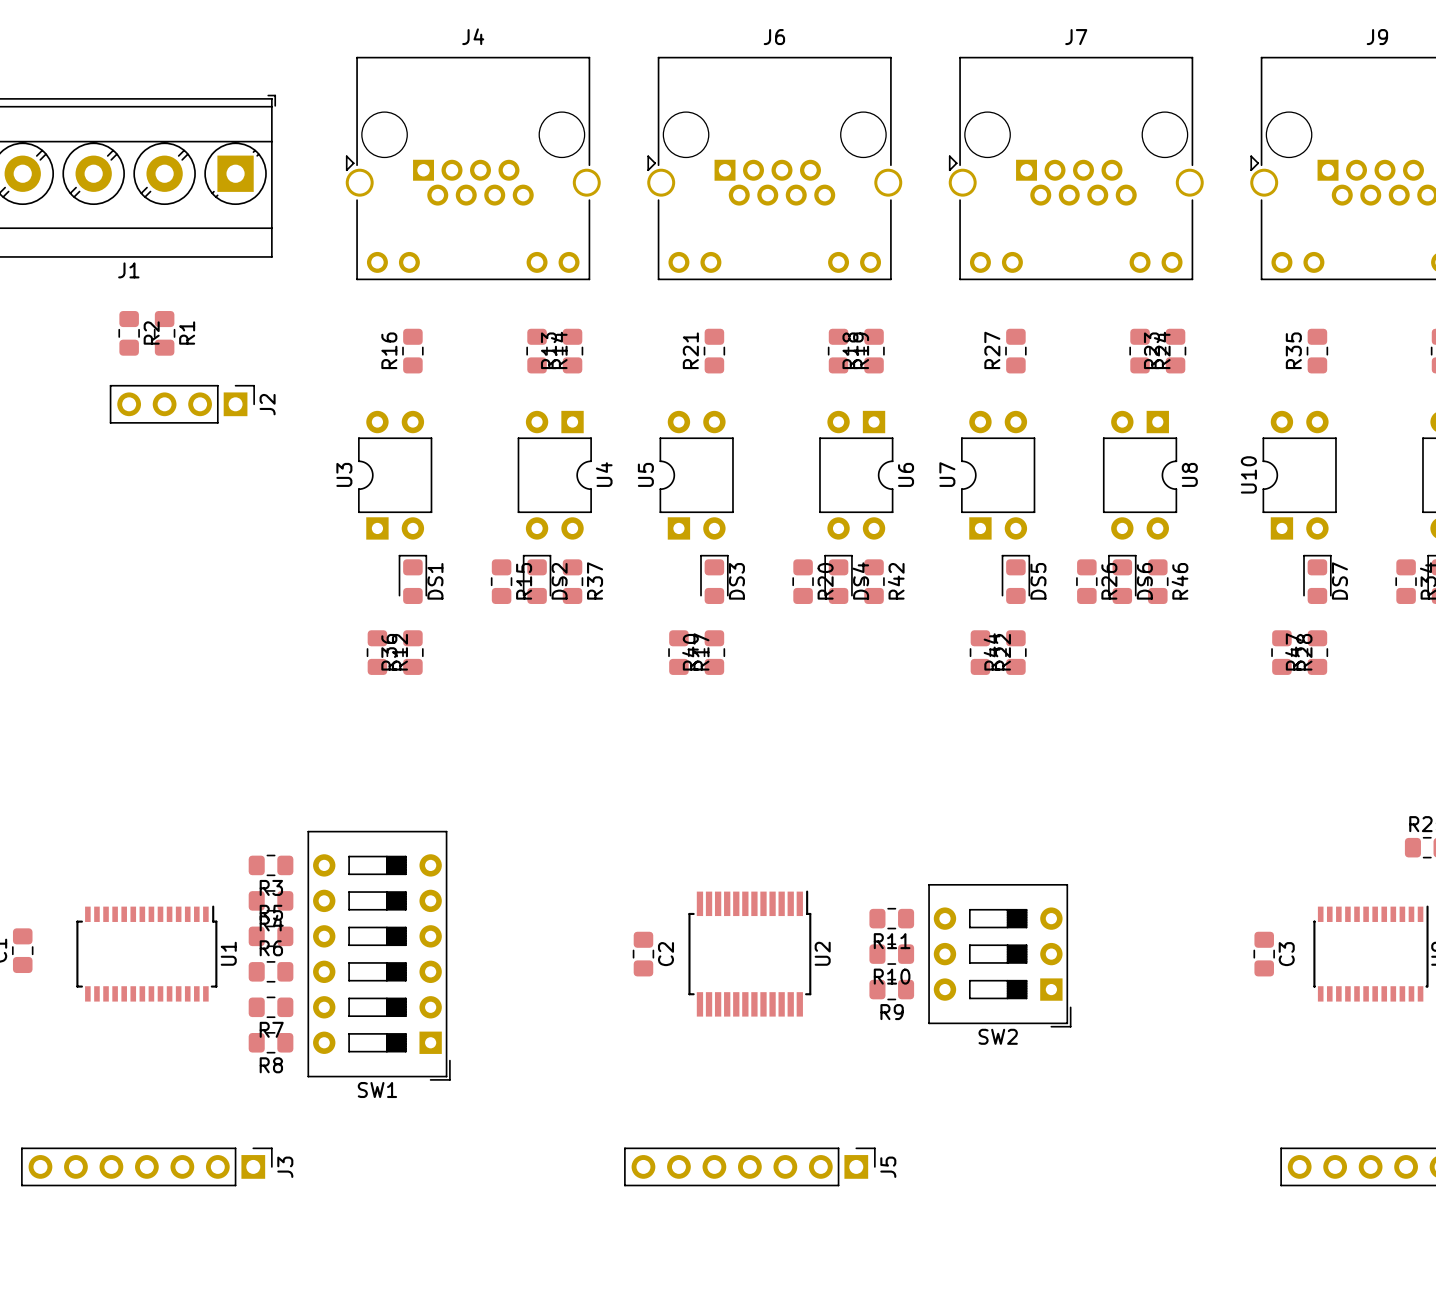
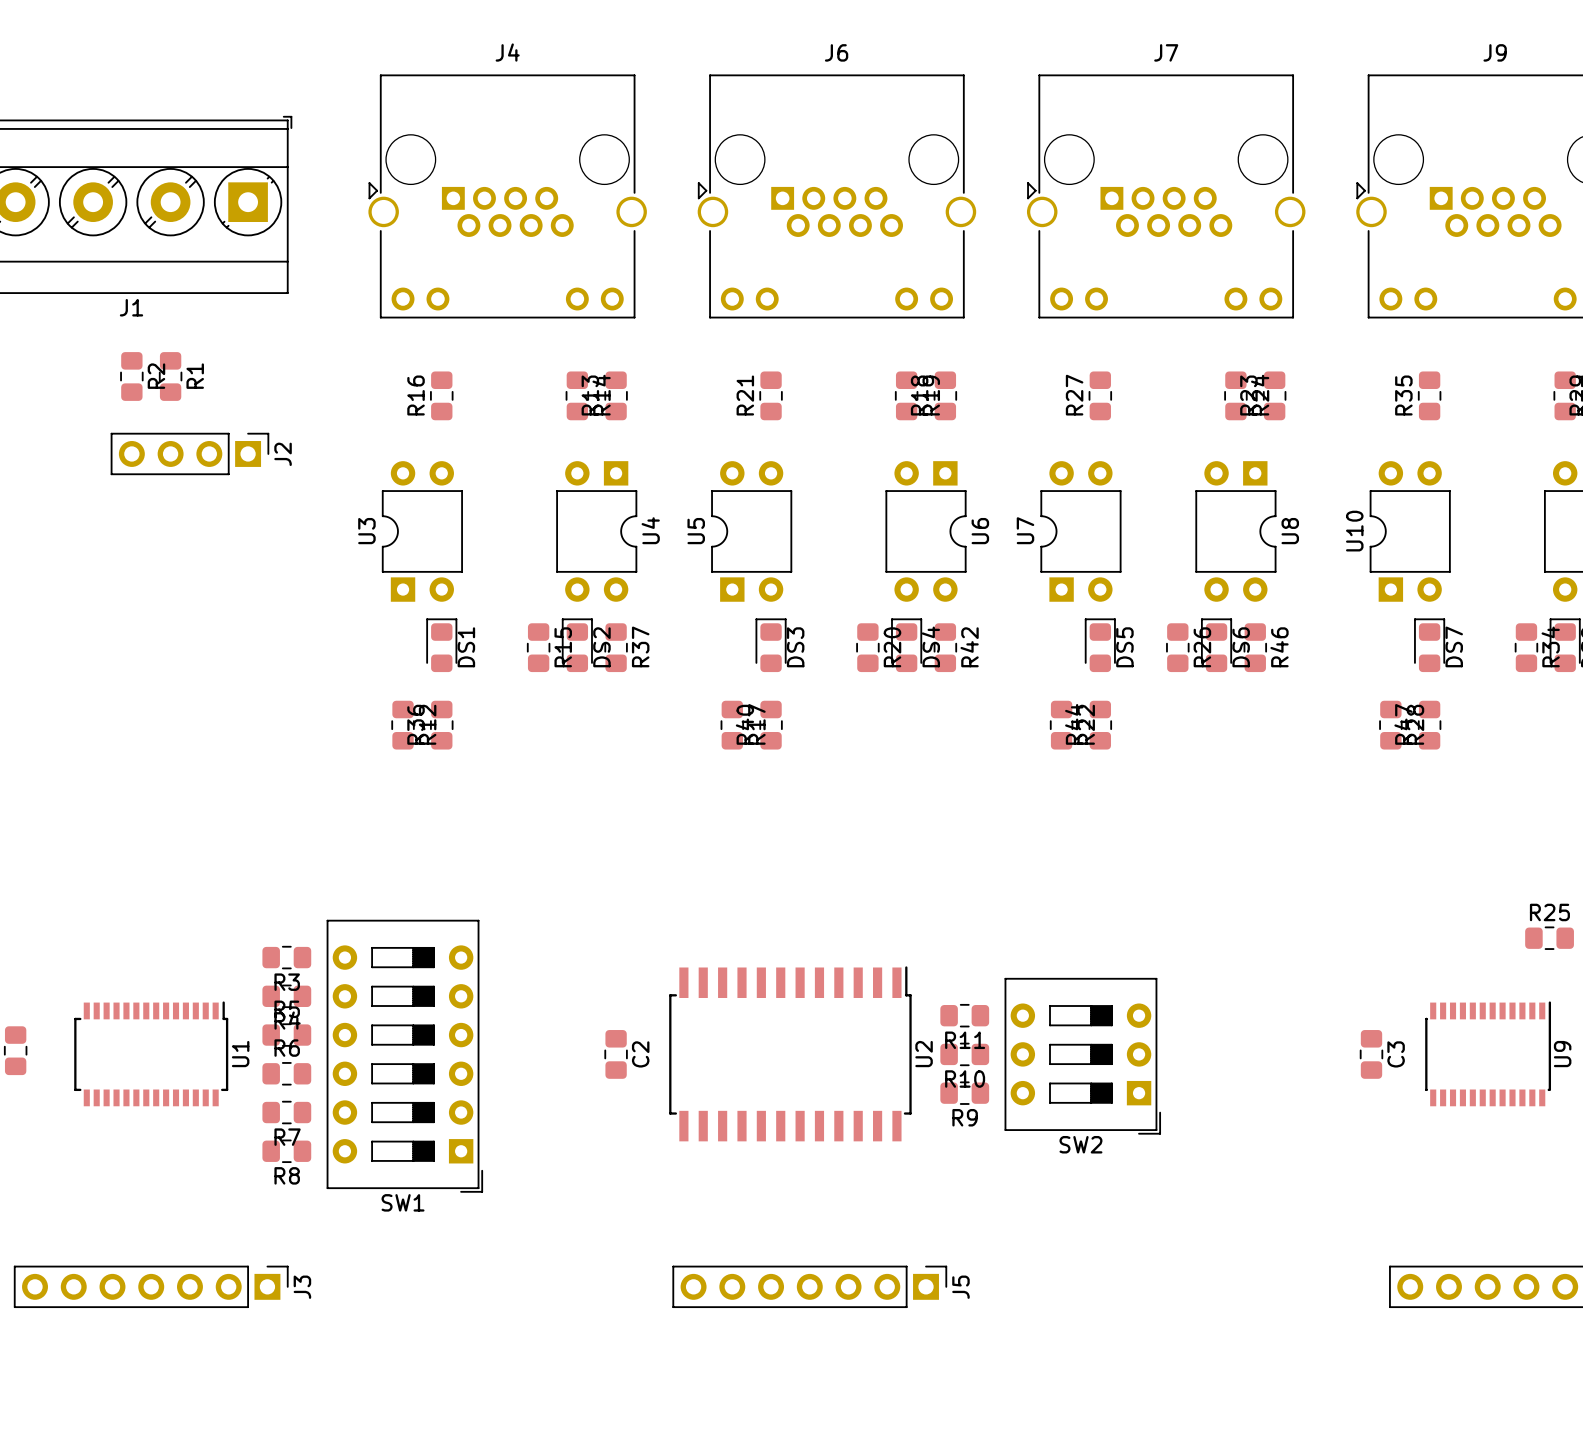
U2 footprint: [688, 890, 812, 1017] -> [669, 966, 912, 1142]
U2 name position: U2 (822, 953) -> U2 (924, 1054)
C2 position: (643, 954) -> (616, 1054)

